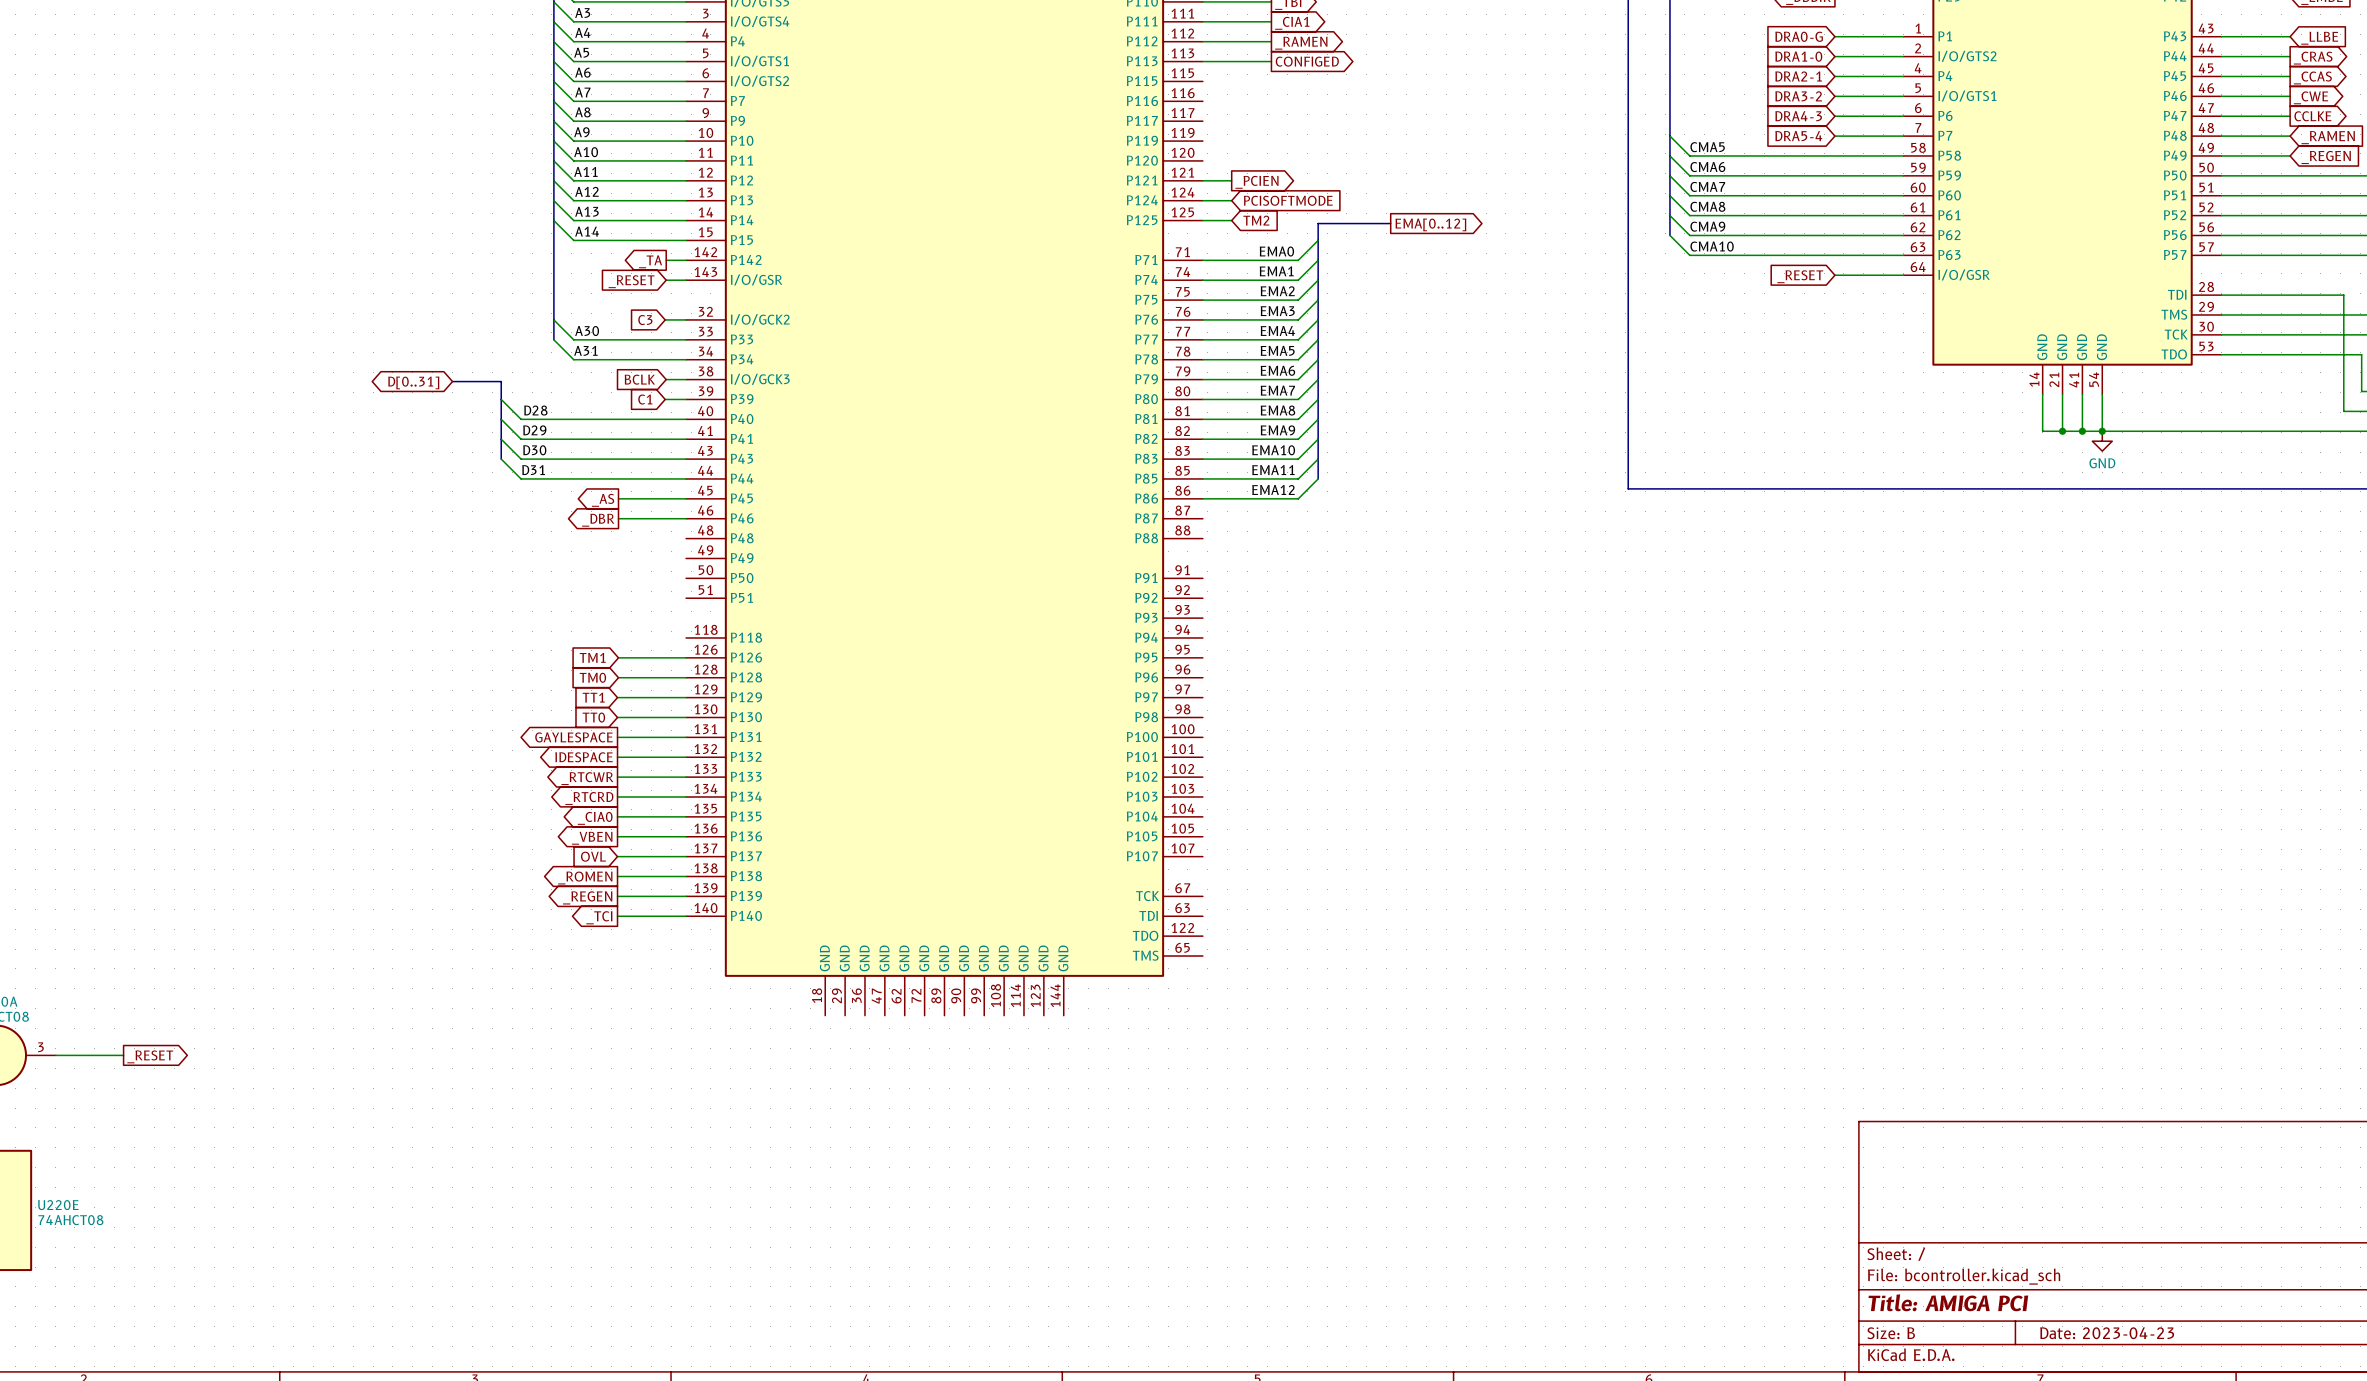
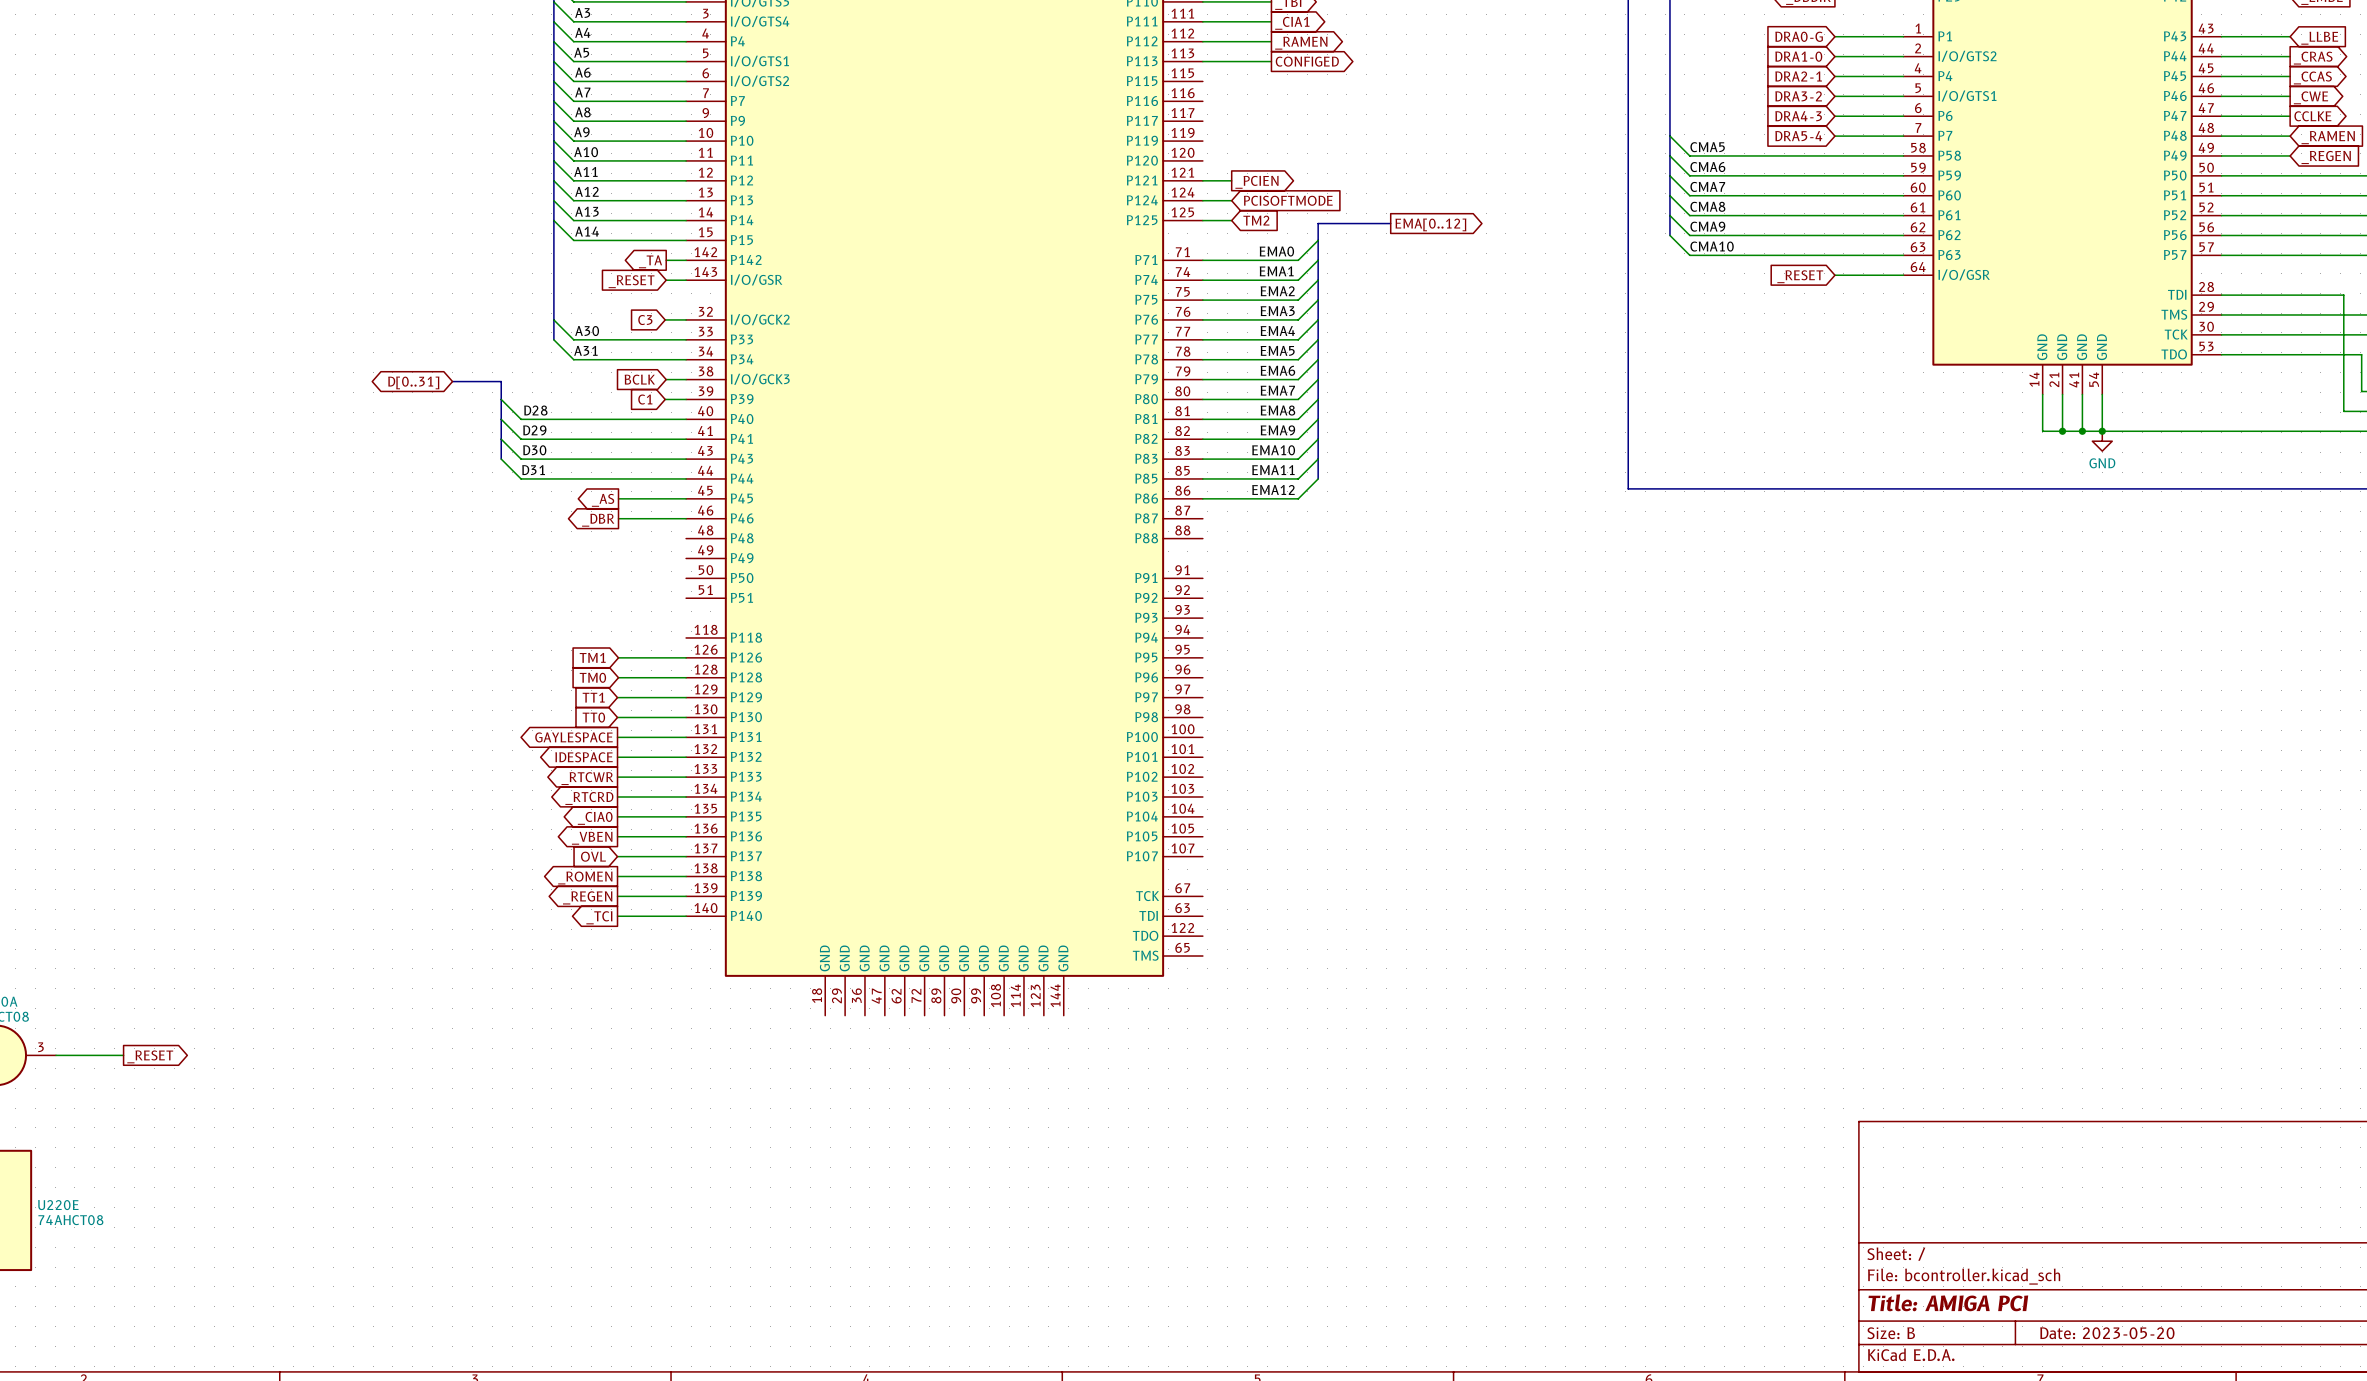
title block: Date: 2023-04-23 (2107, 1333) -> Date: 2023-05-20 (2107, 1333)

